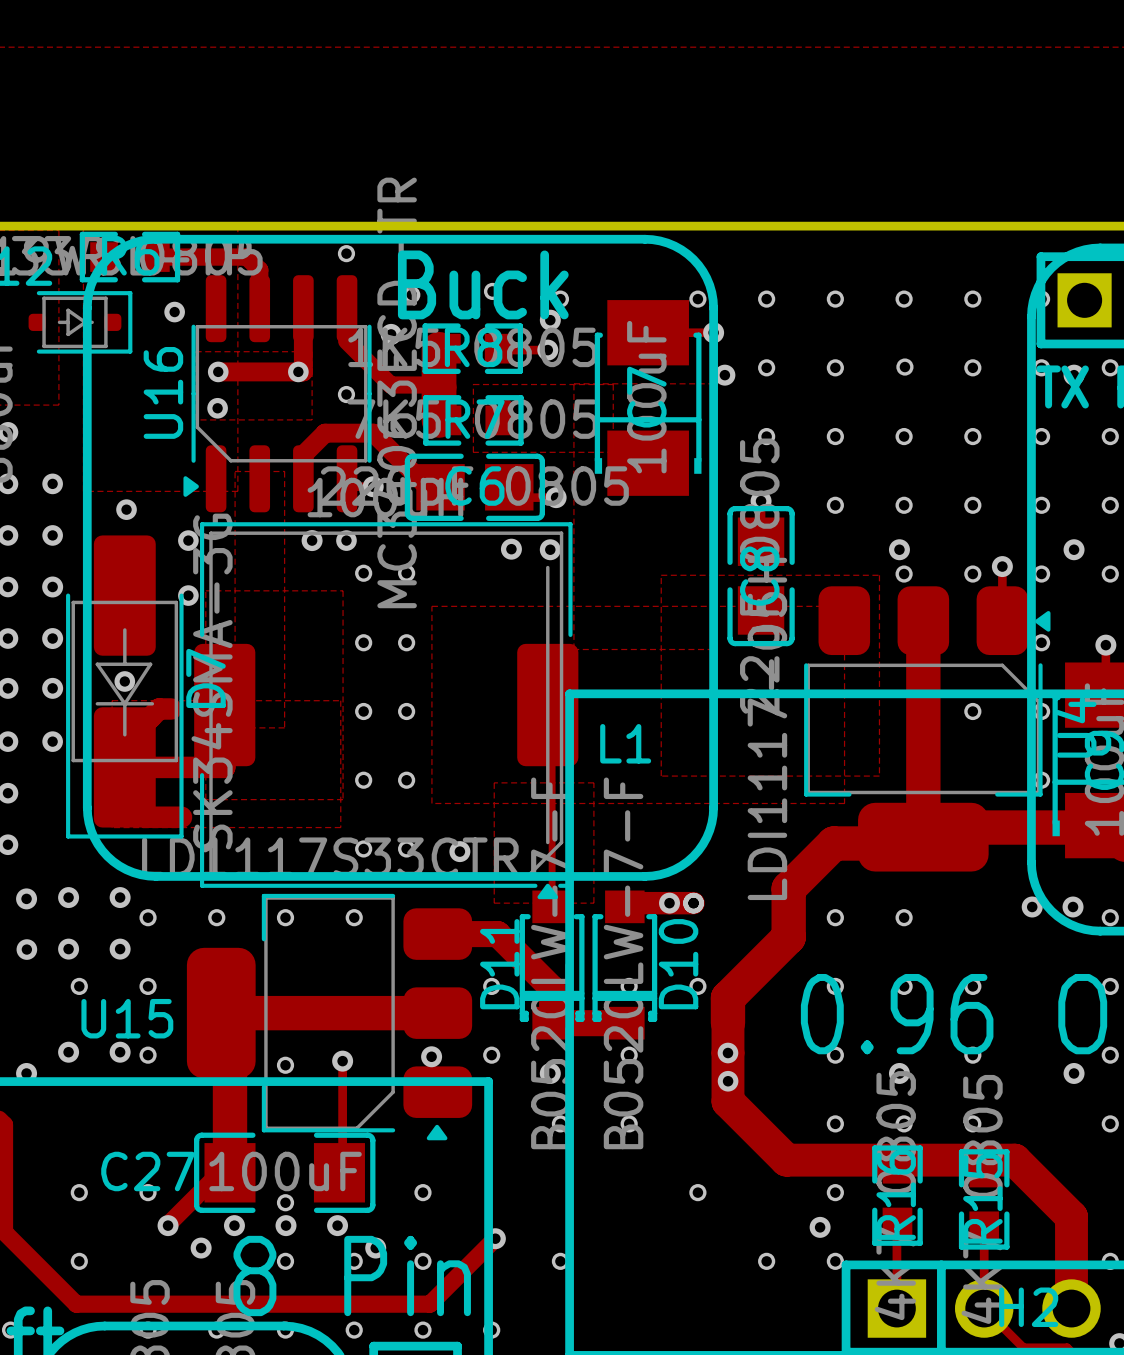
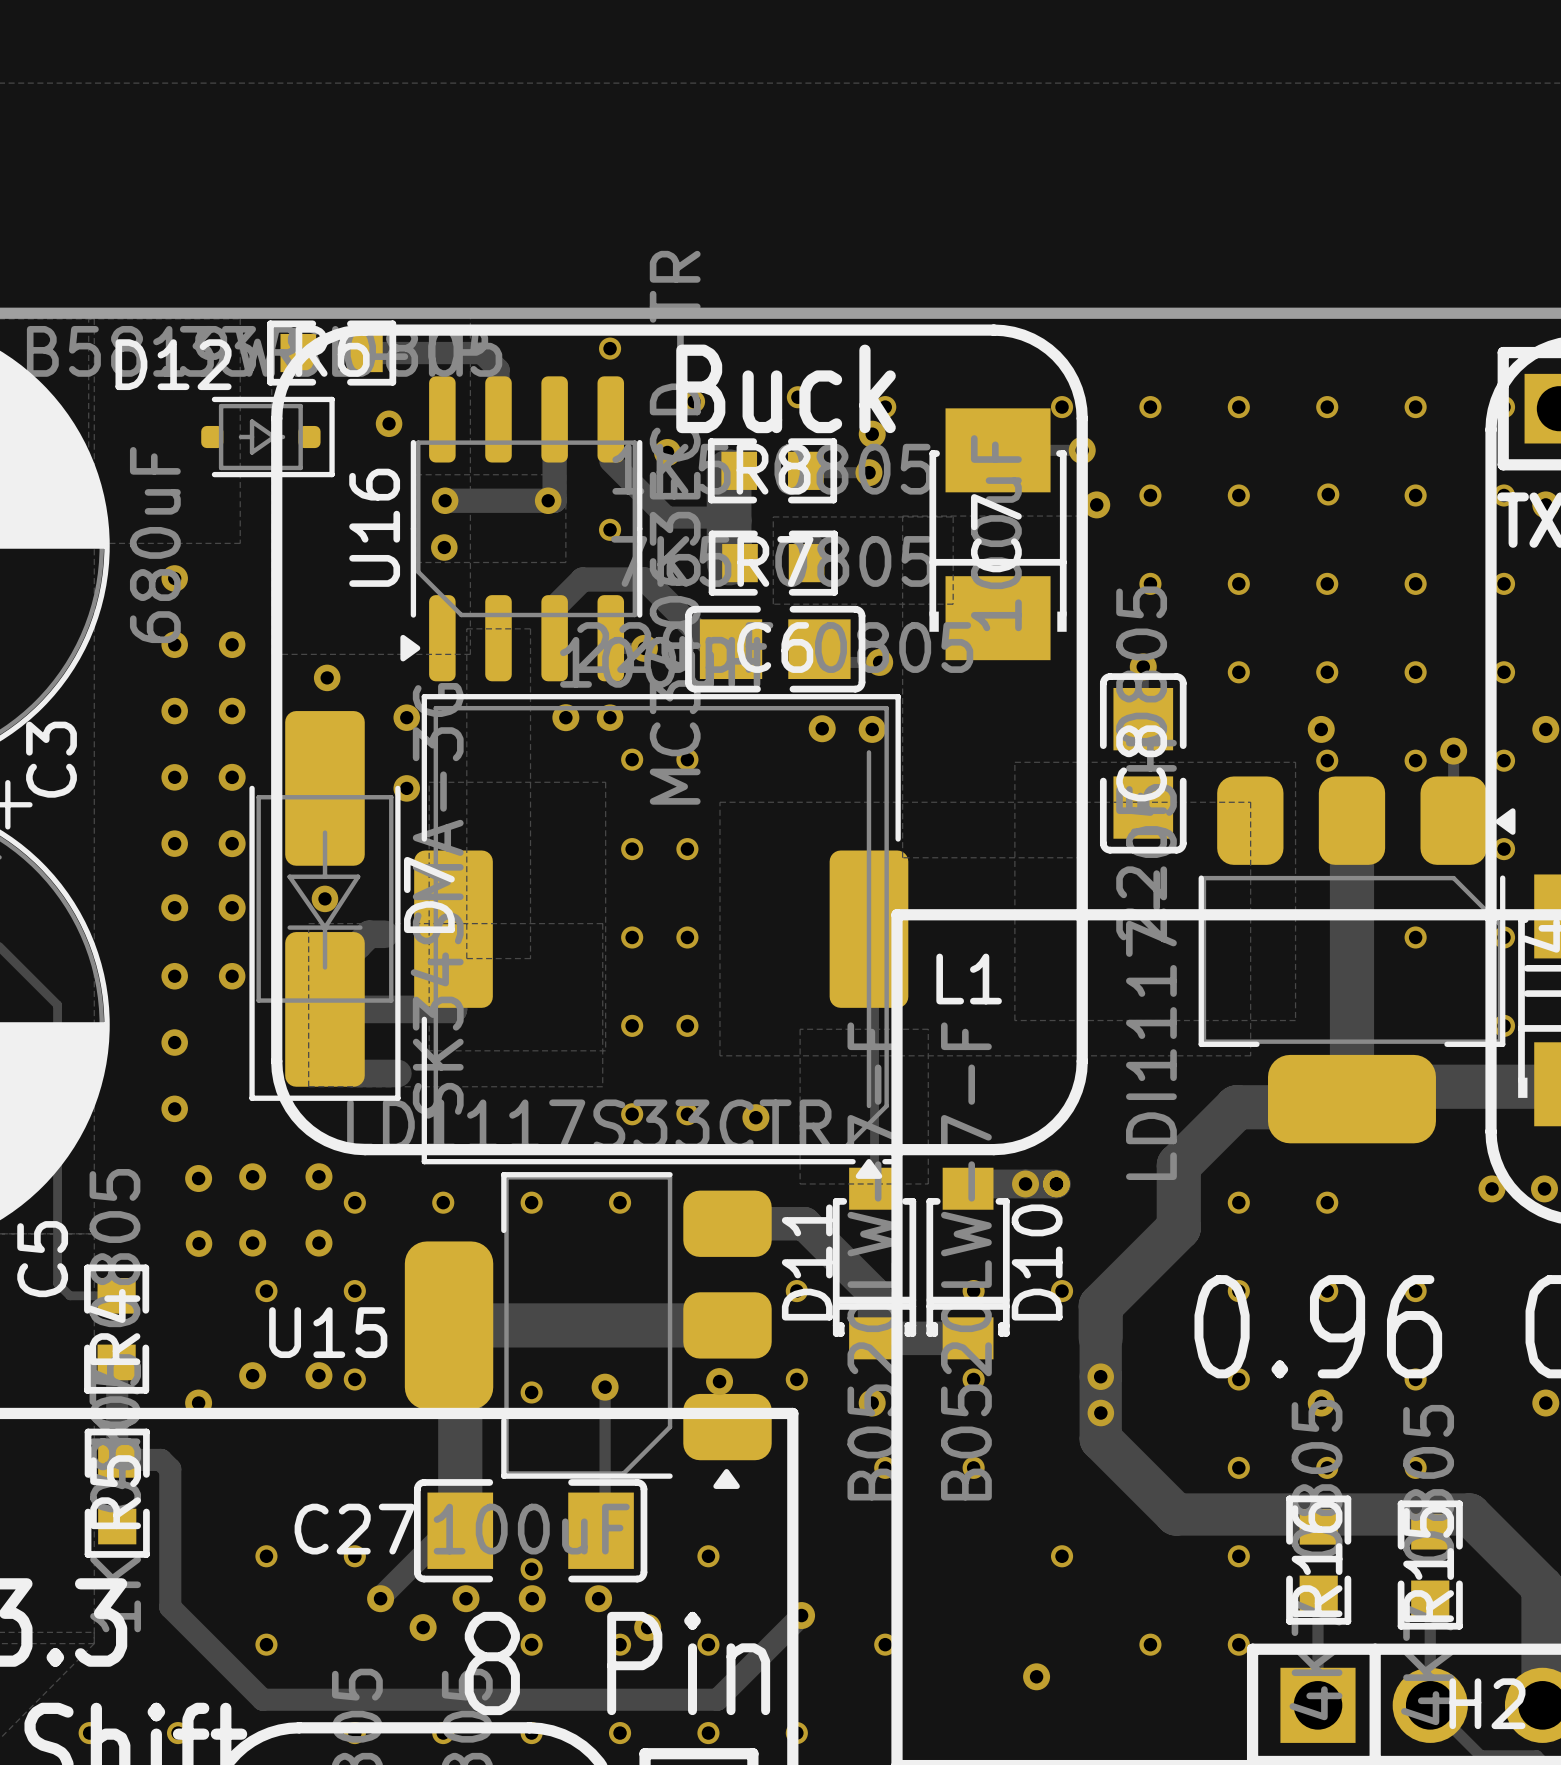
via: (820, 1227) -> none
via: none -> (1036, 1676)

